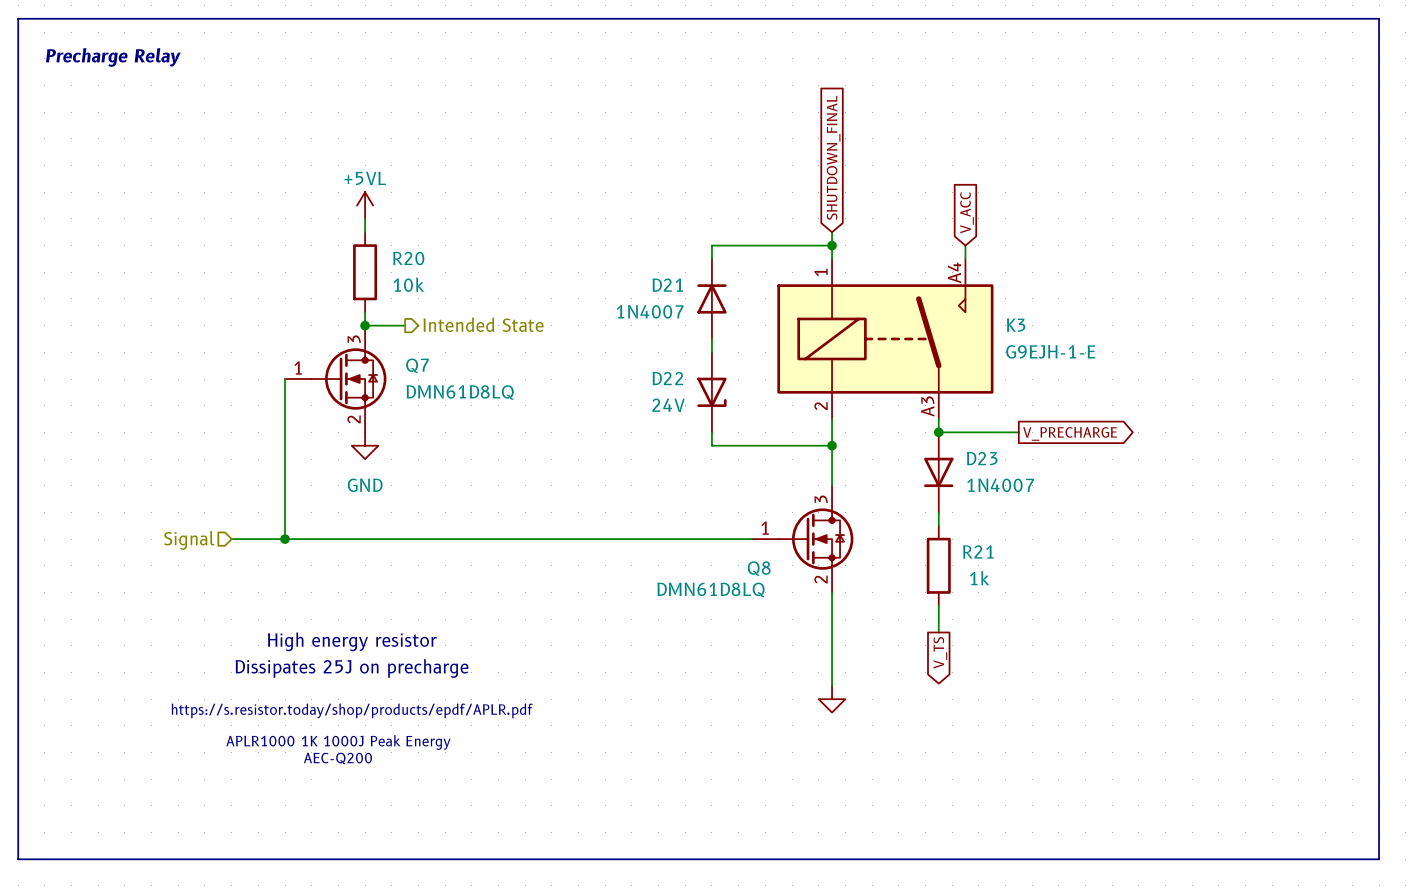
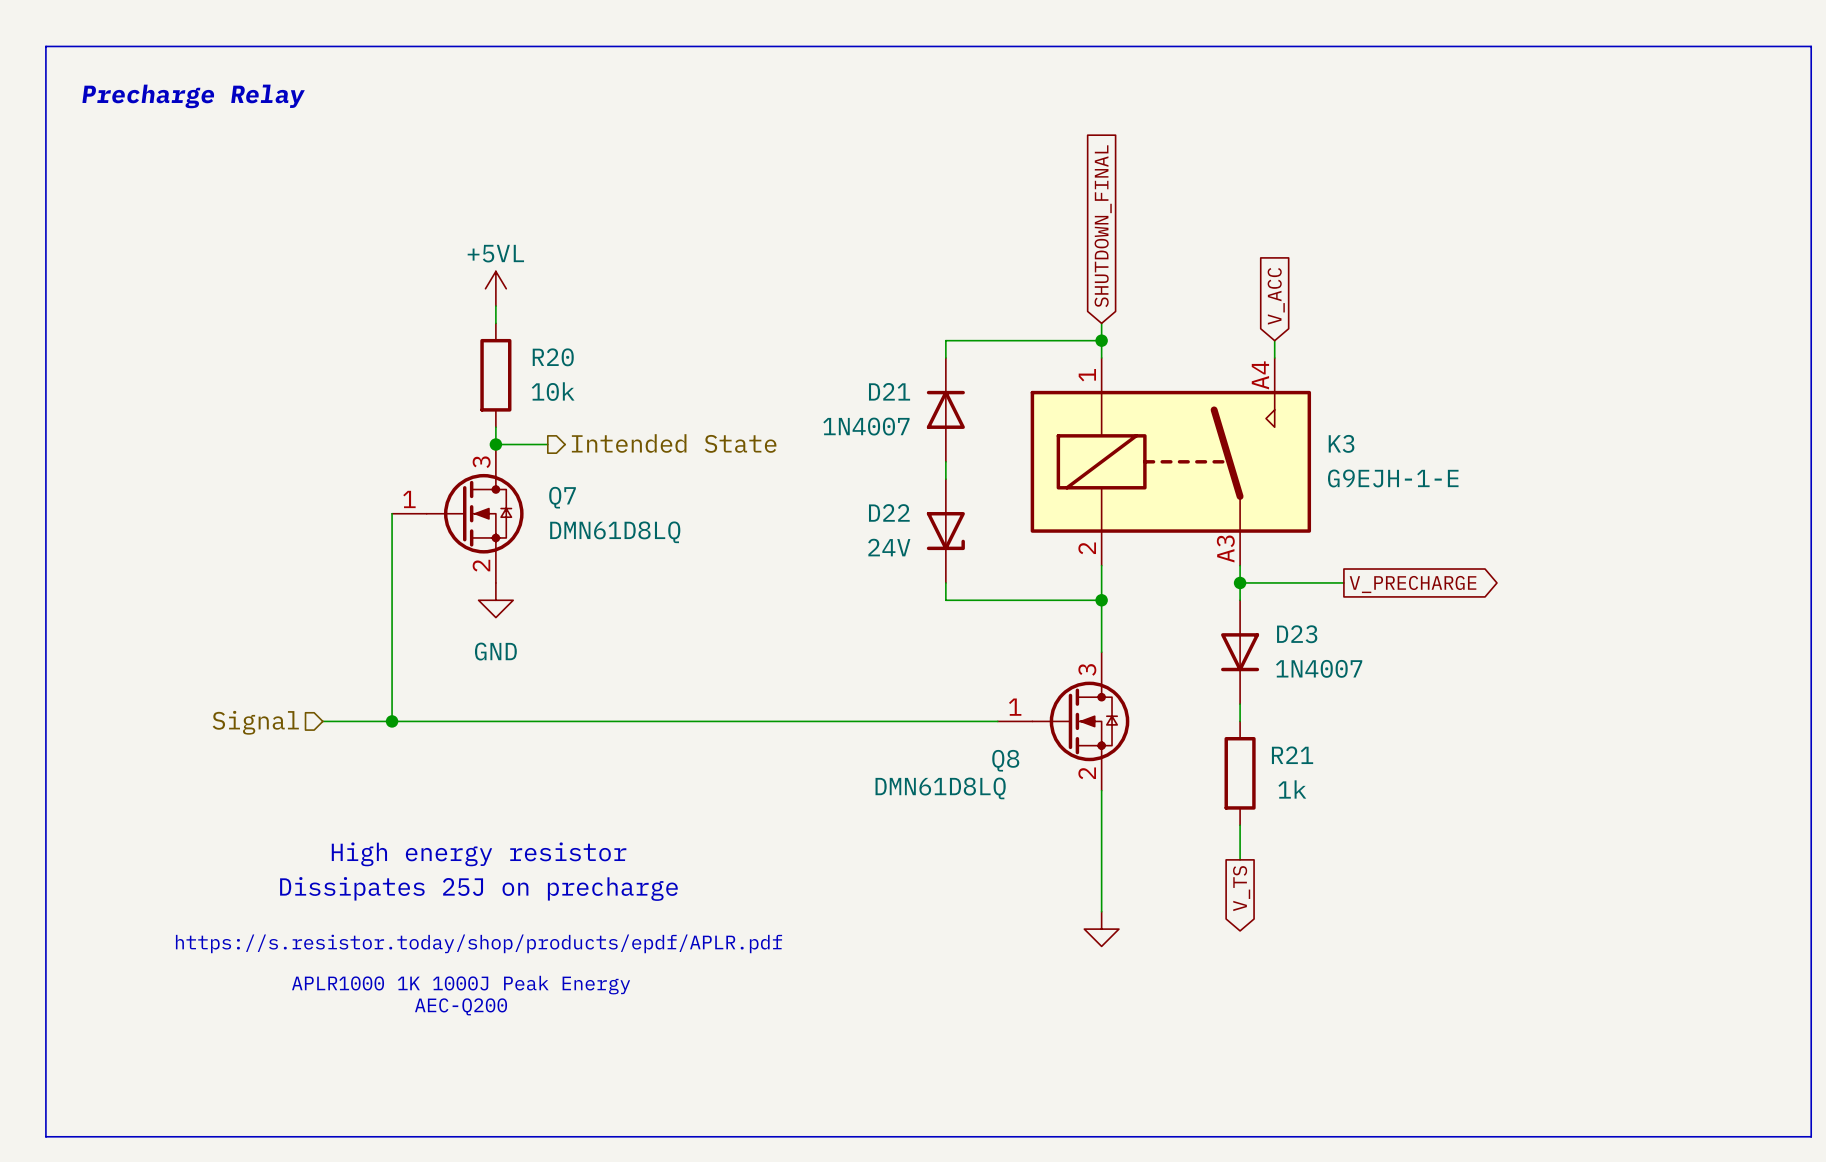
D23 position: (938, 472) -> (1240, 652)
R21 position: (938, 565) -> (1240, 773)
global label position: V_TS (940, 652) -> V_TS (1241, 888)

